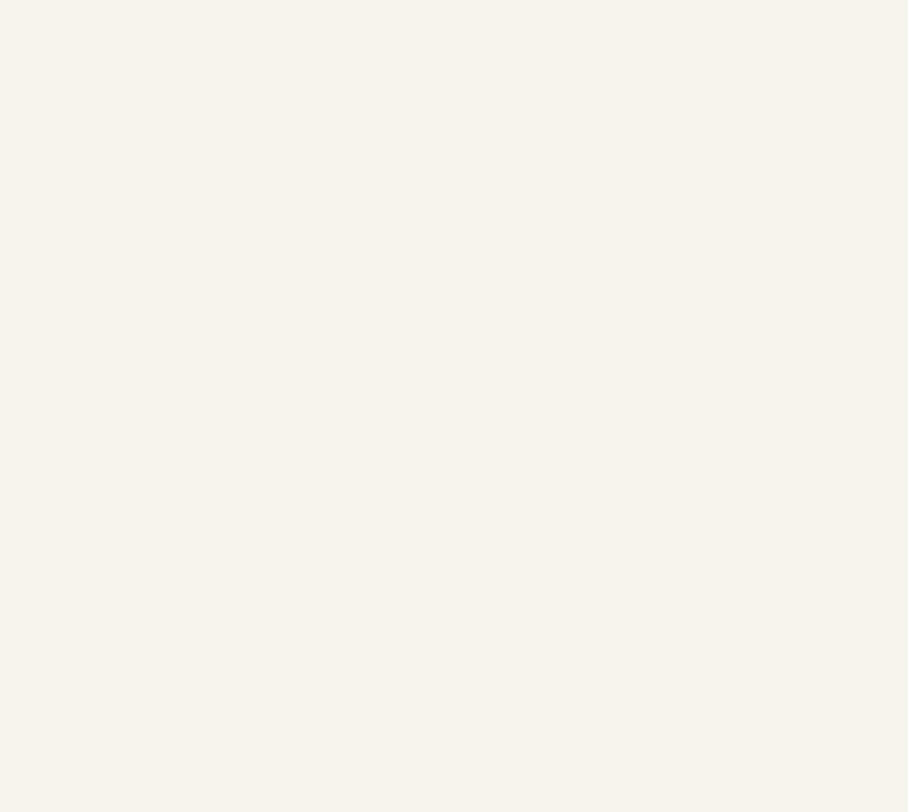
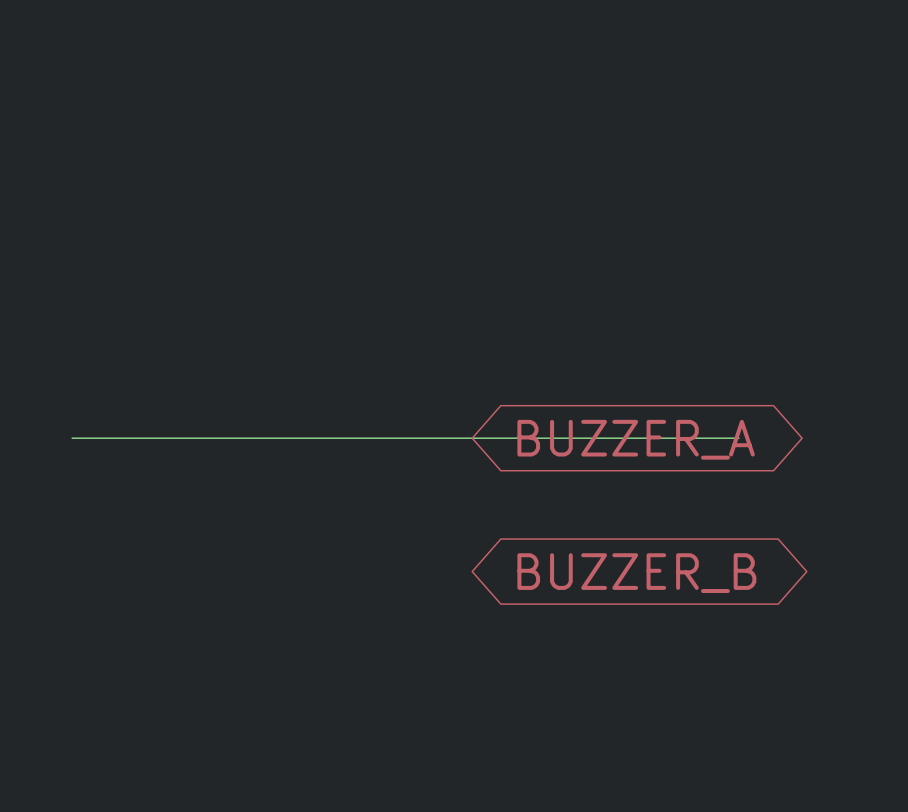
wire: none -> (72, 438) (738, 438)
global label: none -> BUZZER_A (636, 439)
global label: none -> BUZZER_B (636, 573)

